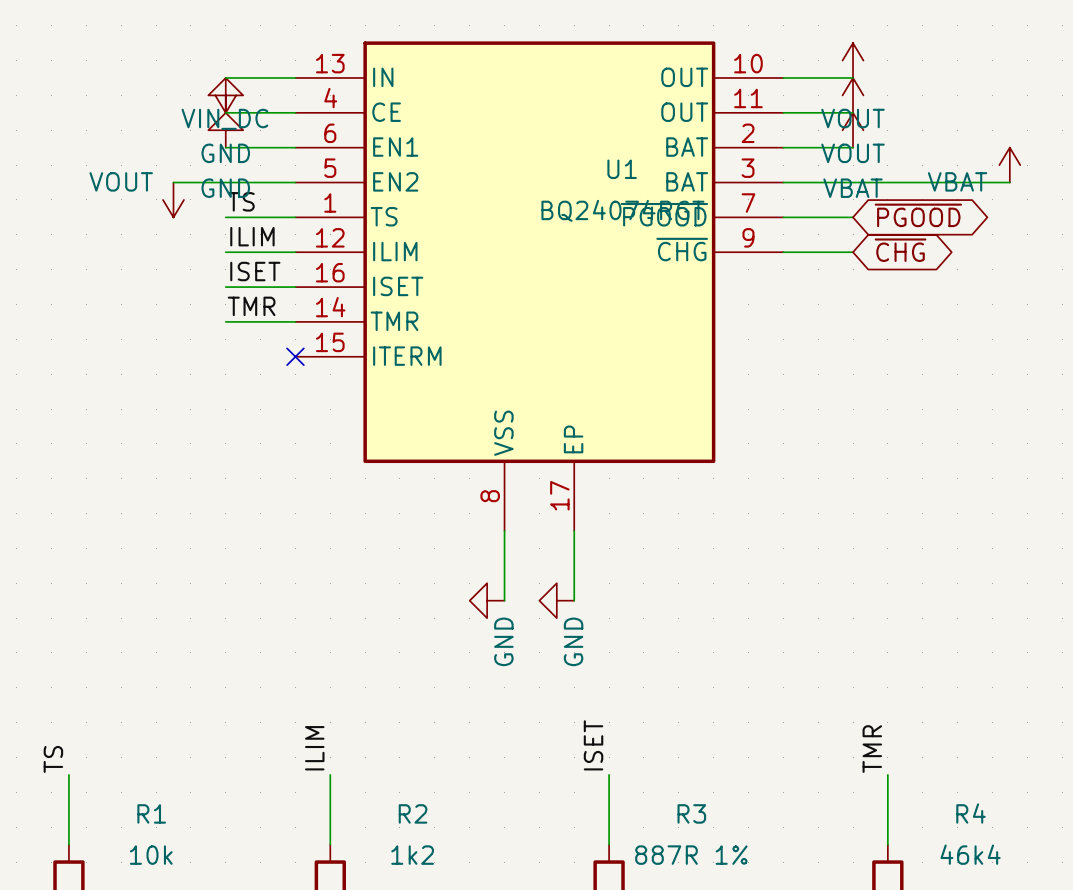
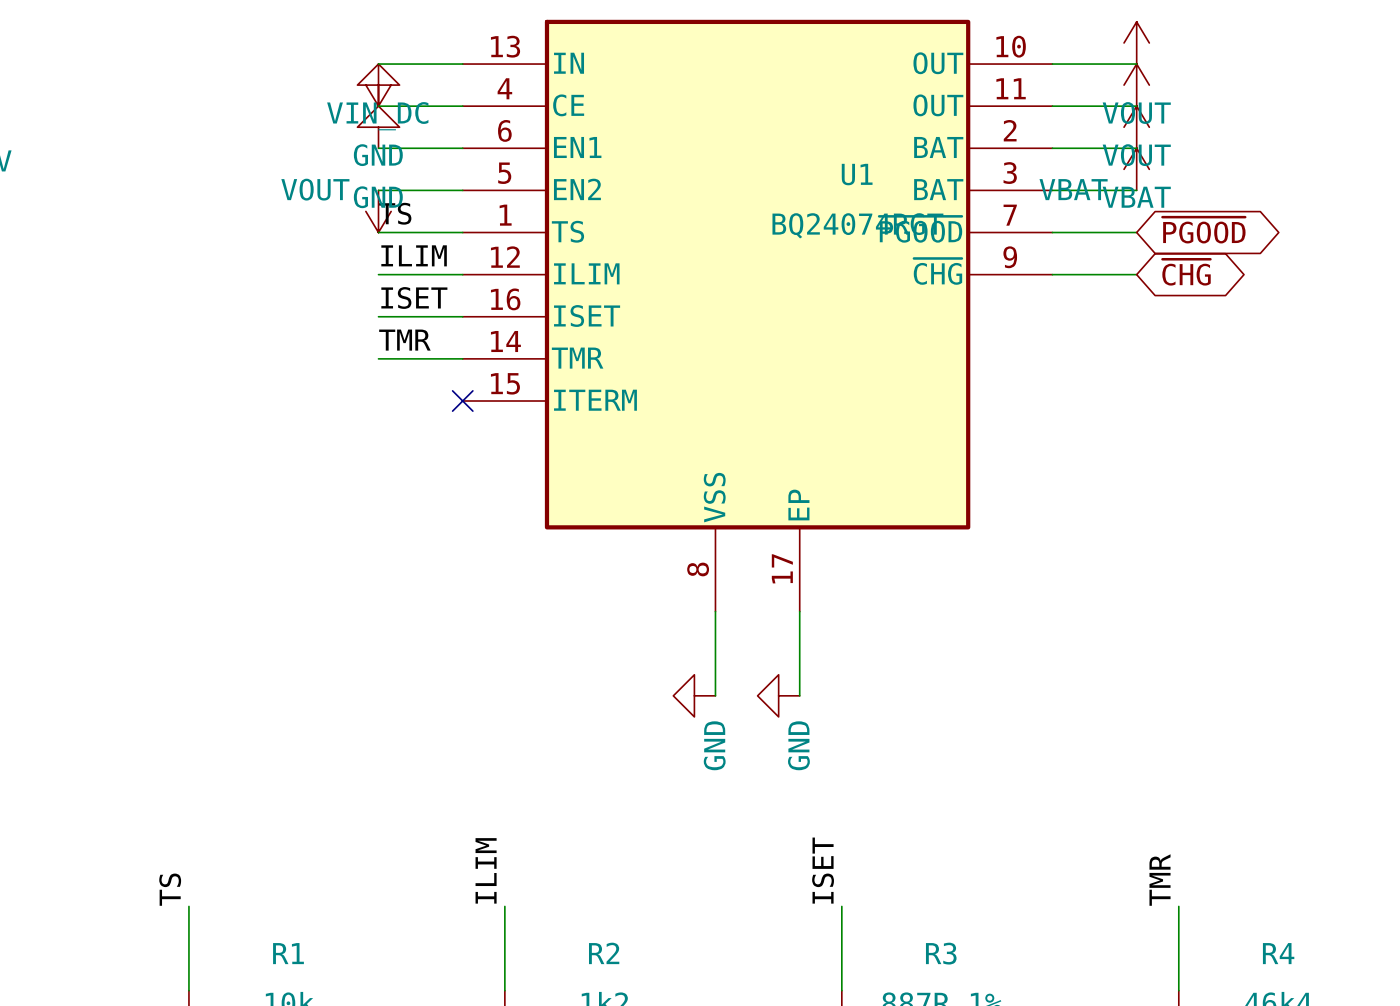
power symbol position: VBAT (1009, 165) -> VBAT (1136, 169)
wire: (173, 182) (225, 182) -> none
wire: (853, 182) (1009, 182) -> none
power symbol position: VOUT (173, 199) -> VOUT (378, 211)

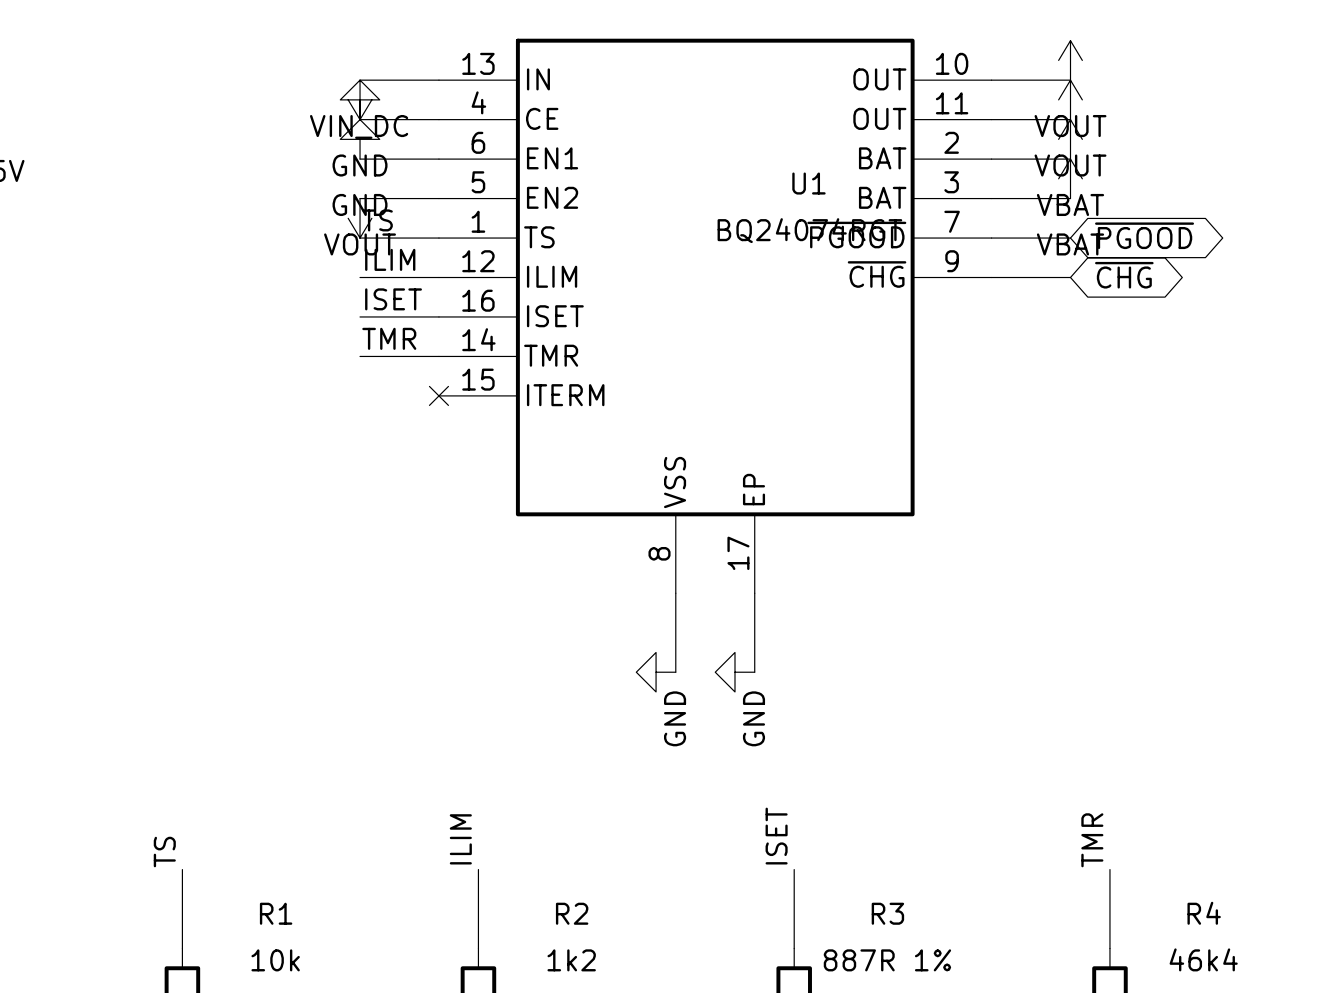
power symbol text position: VOUT (315, 189) -> VOUT (360, 244)
power symbol text position: VBAT (1073, 189) -> VBAT (1070, 244)

